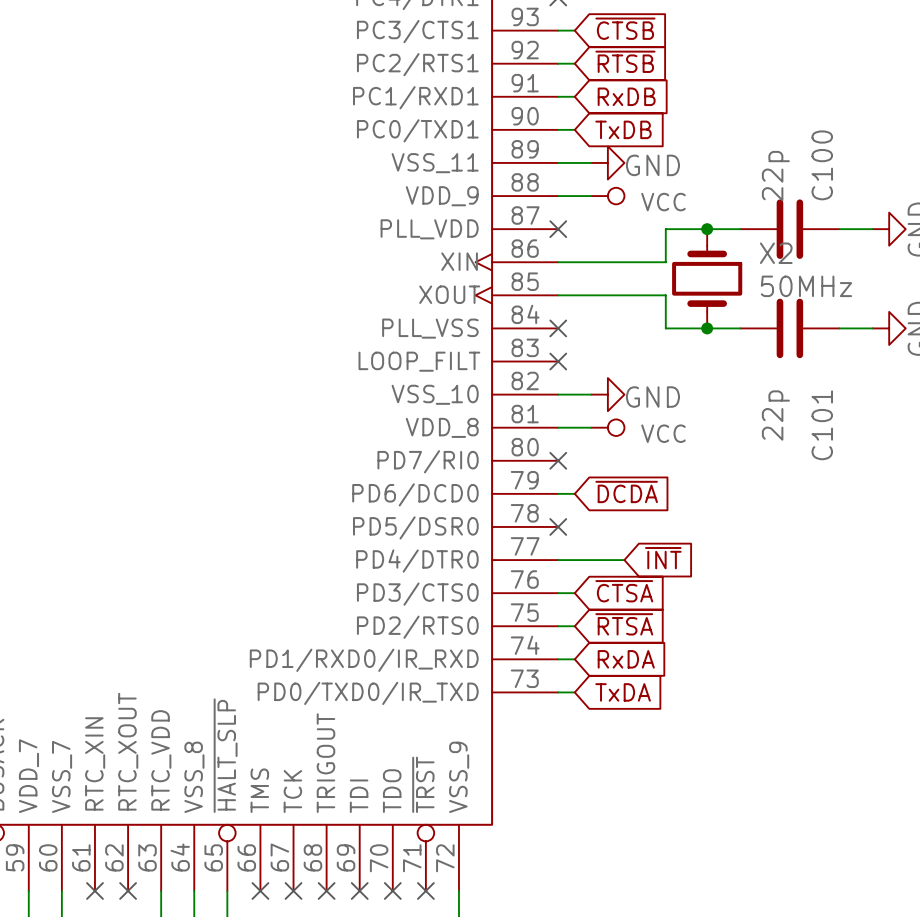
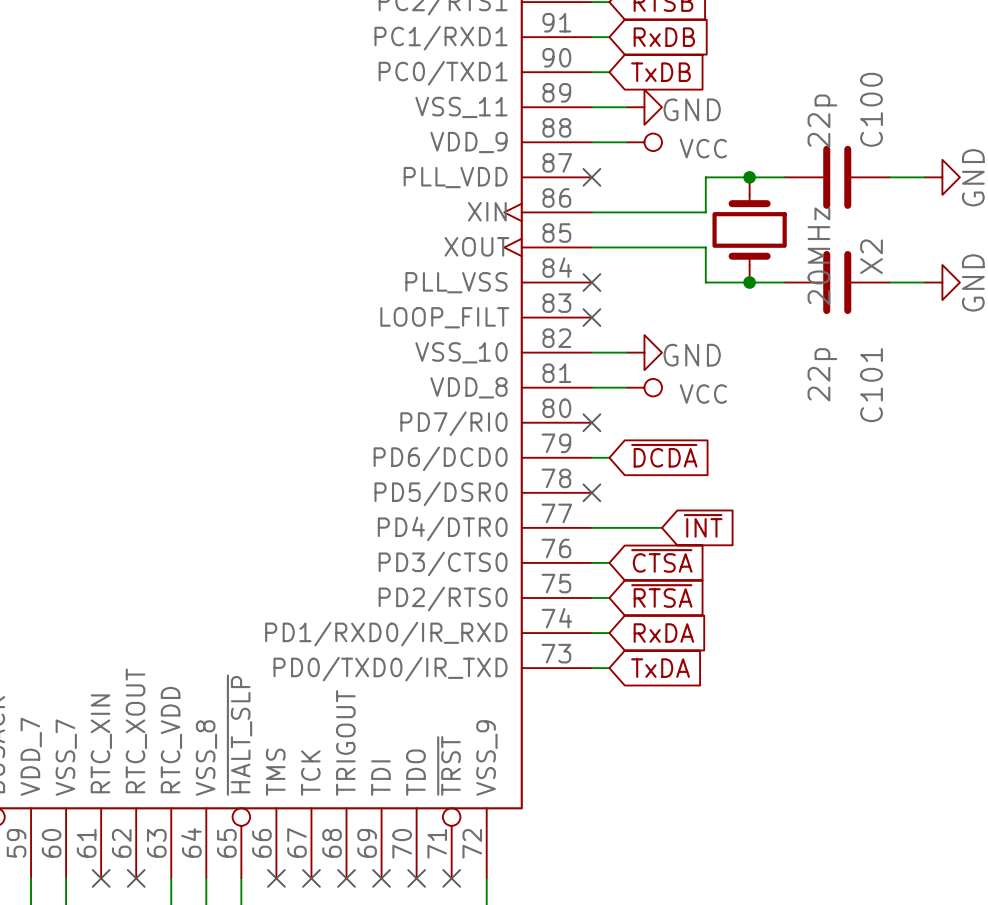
X2 name rotation: 0° (776, 253) -> 90° counterclockwise (871, 256)
X2 name position: X2 (776, 253) -> X2 (871, 256)
X2 value: 50MHz (806, 286) -> 20MHz (818, 256)

